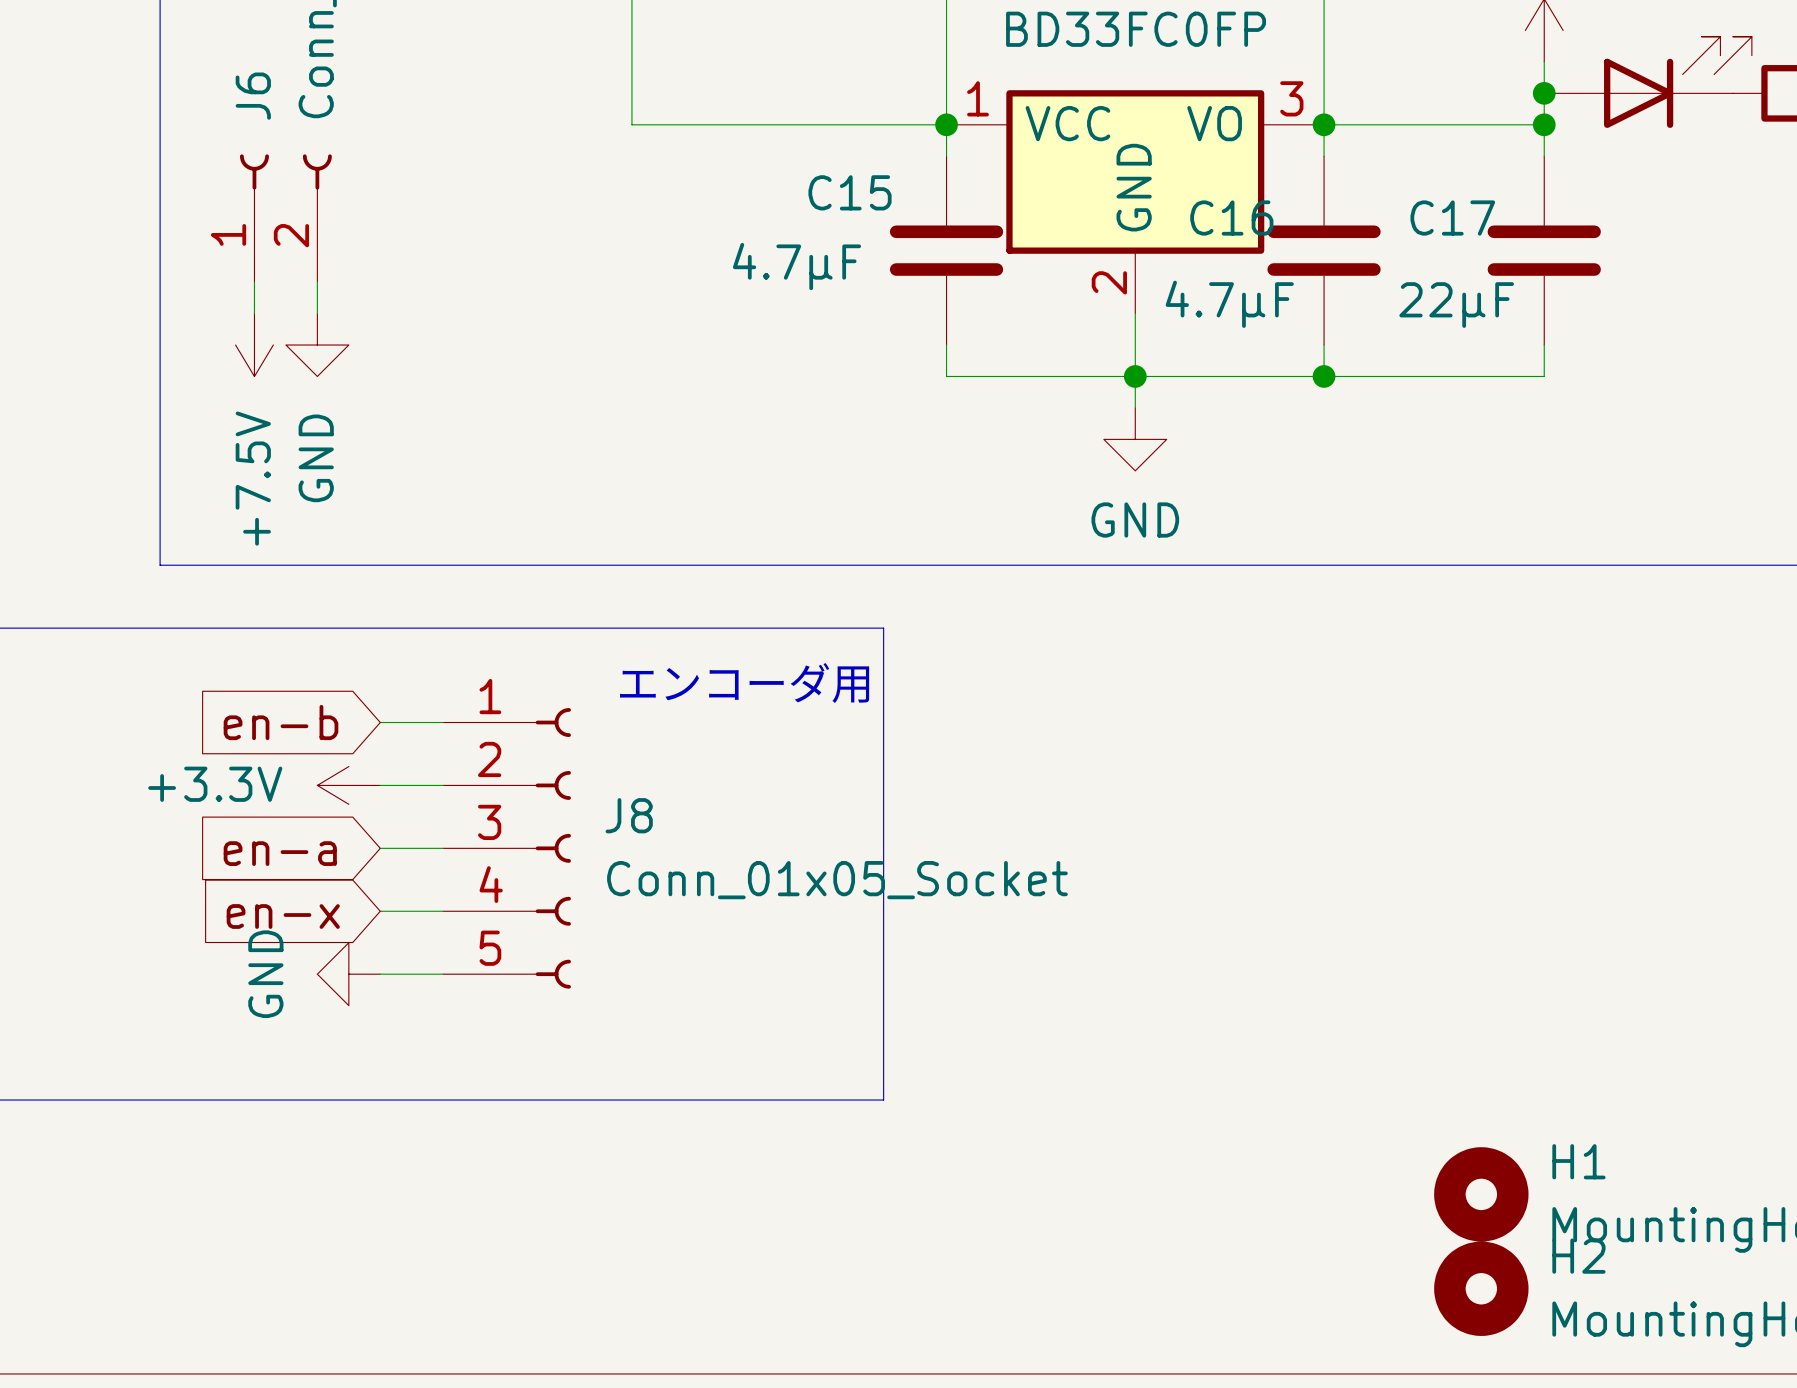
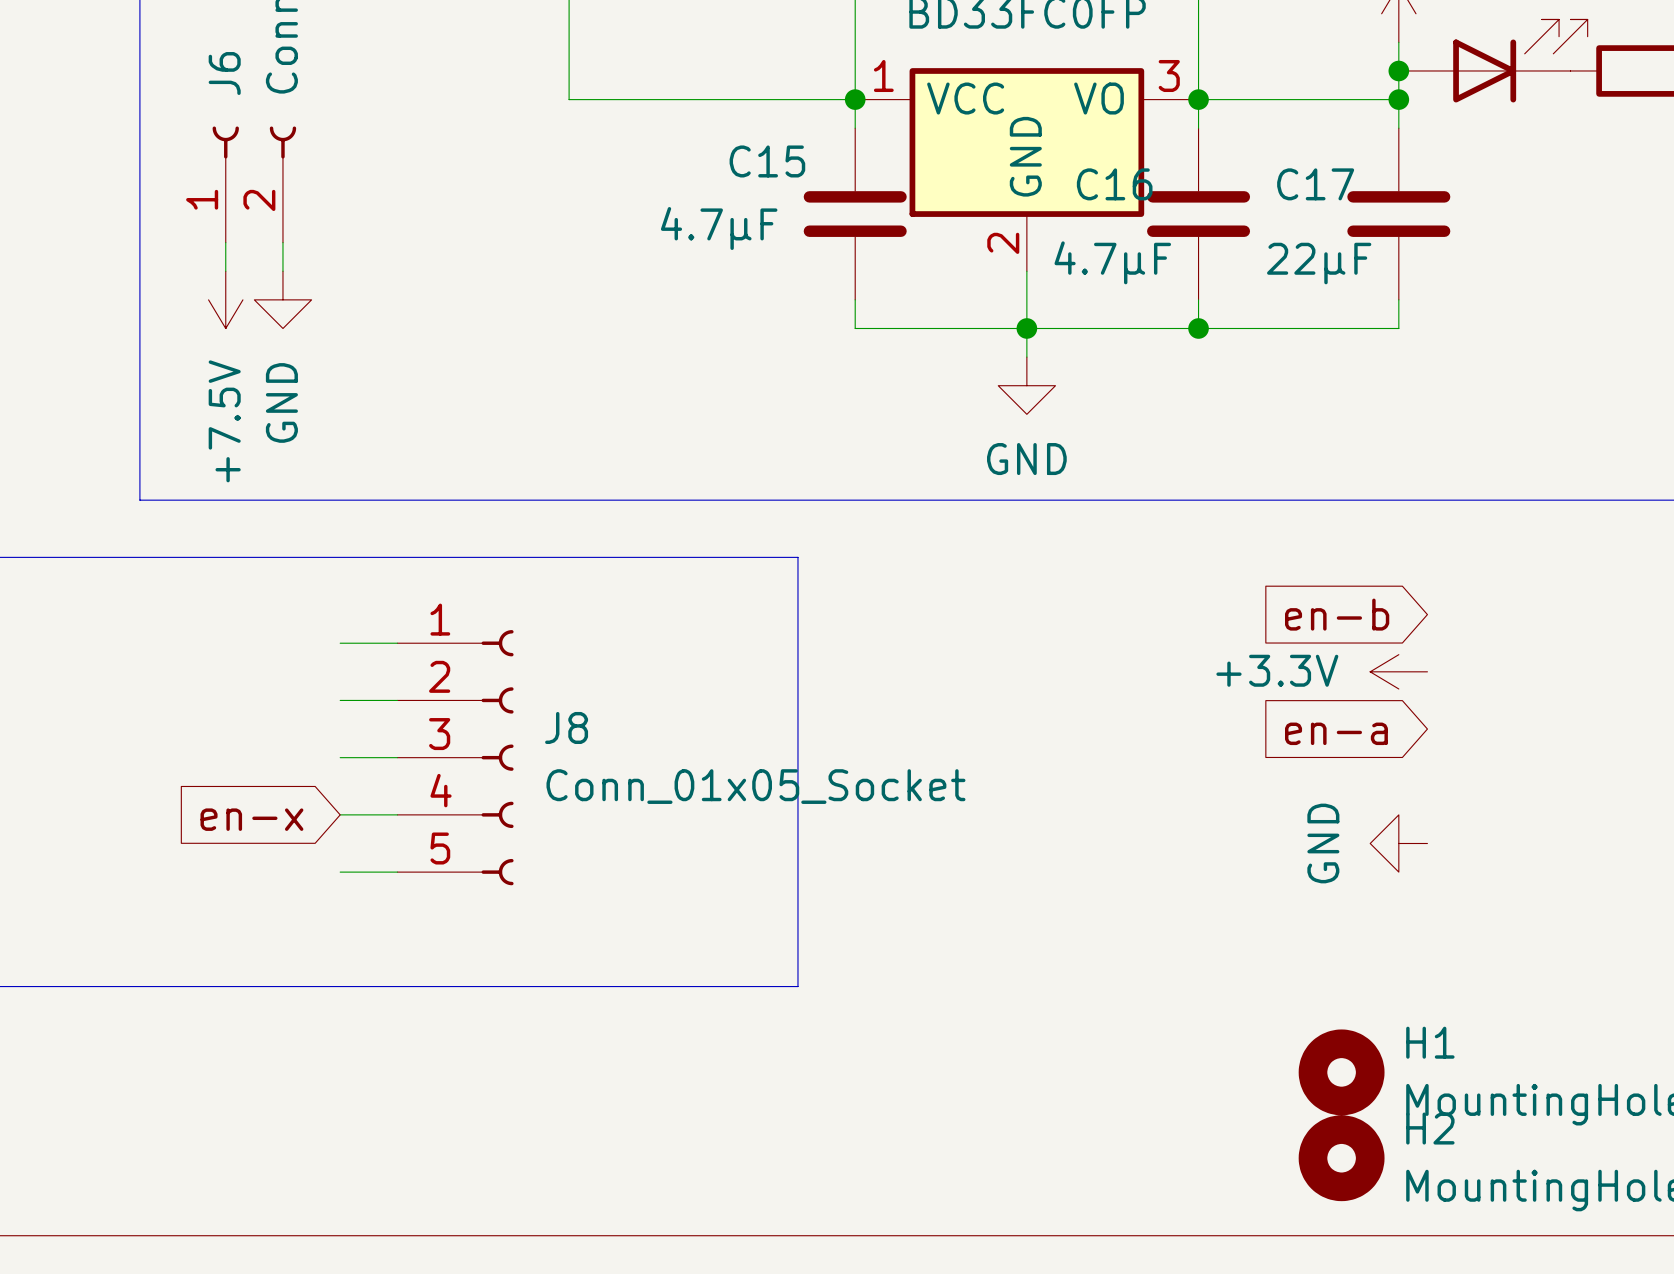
text: エンコーダ用 (744, 683) -> none
global label: none -> en-b (1337, 614)
global label: en-b (281, 722) -> none
power symbol: none -> +3.3V (1398, 671)
power symbol: +3.3V (348, 785) -> none
global label: none -> en-a (1336, 733)
global label: en-a (280, 853) -> none
power symbol: none -> GND (1398, 843)
power symbol: GND (348, 974) -> none

